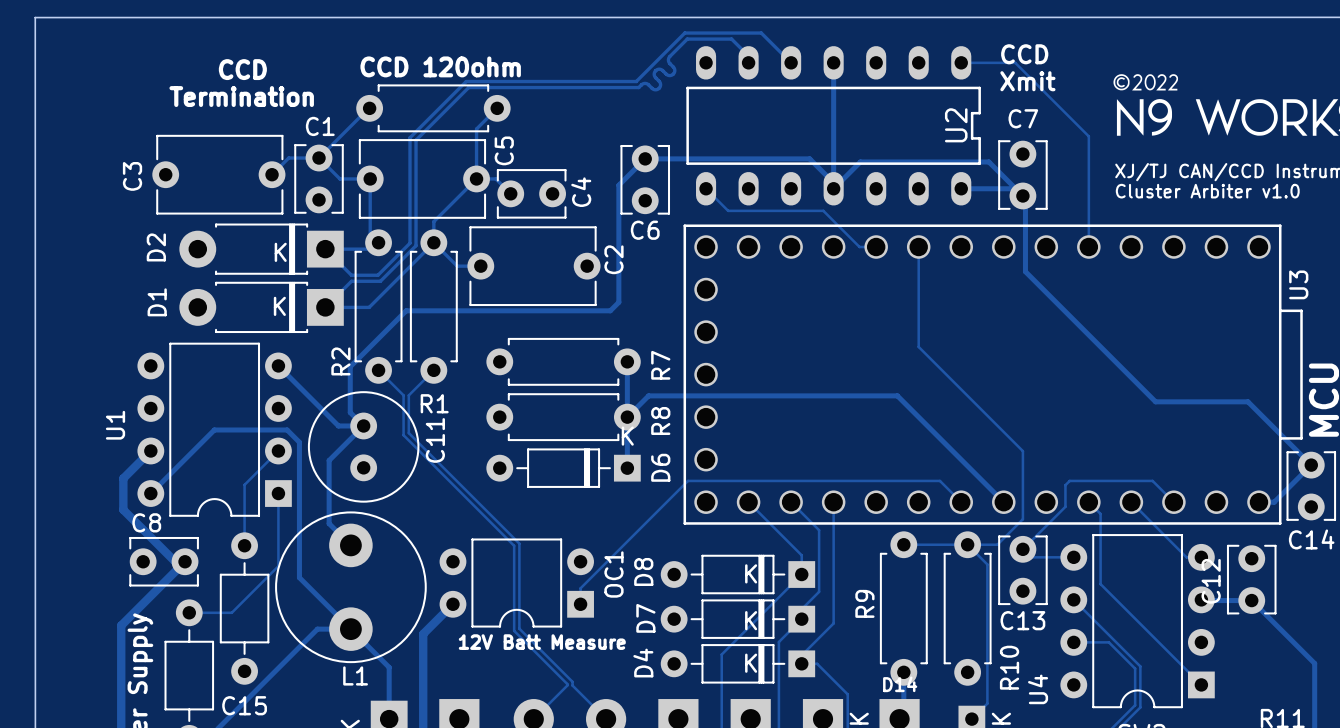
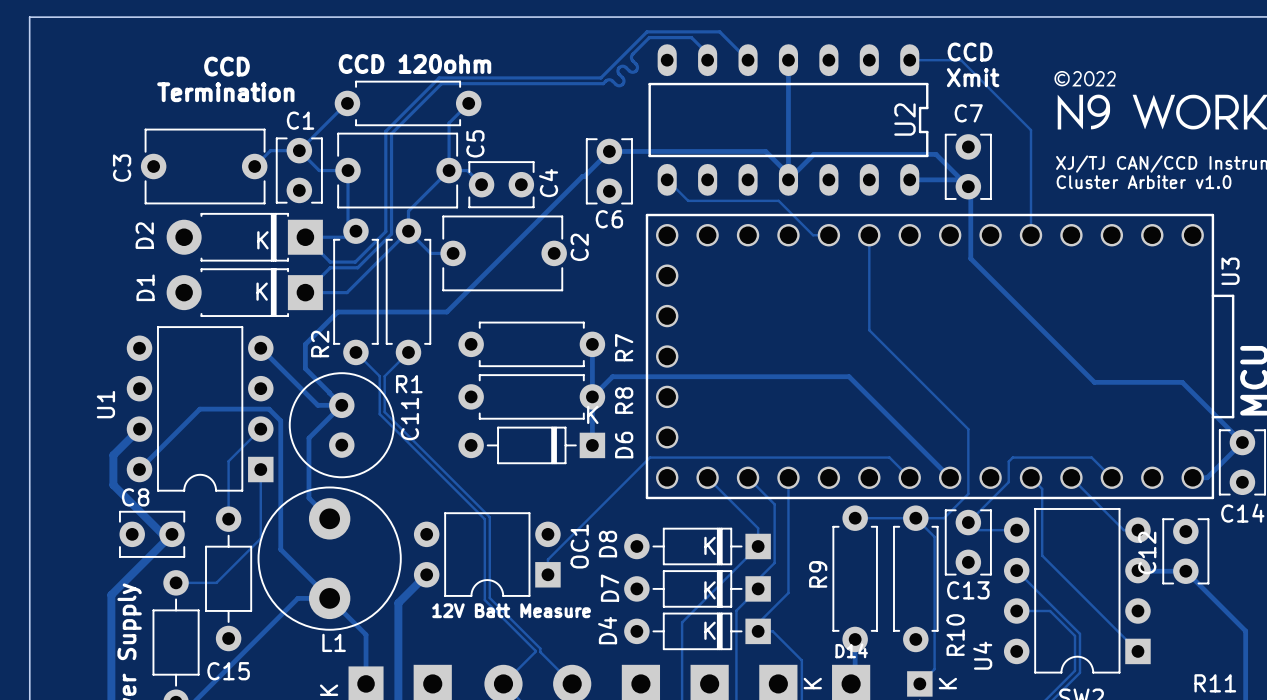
track: (618, 185) (618, 302) (610, 310) (406, 310) (350, 366) (350, 413) -> (584, 176) (446, 312) (337, 312) (305, 344) (305, 368) (329, 393)

